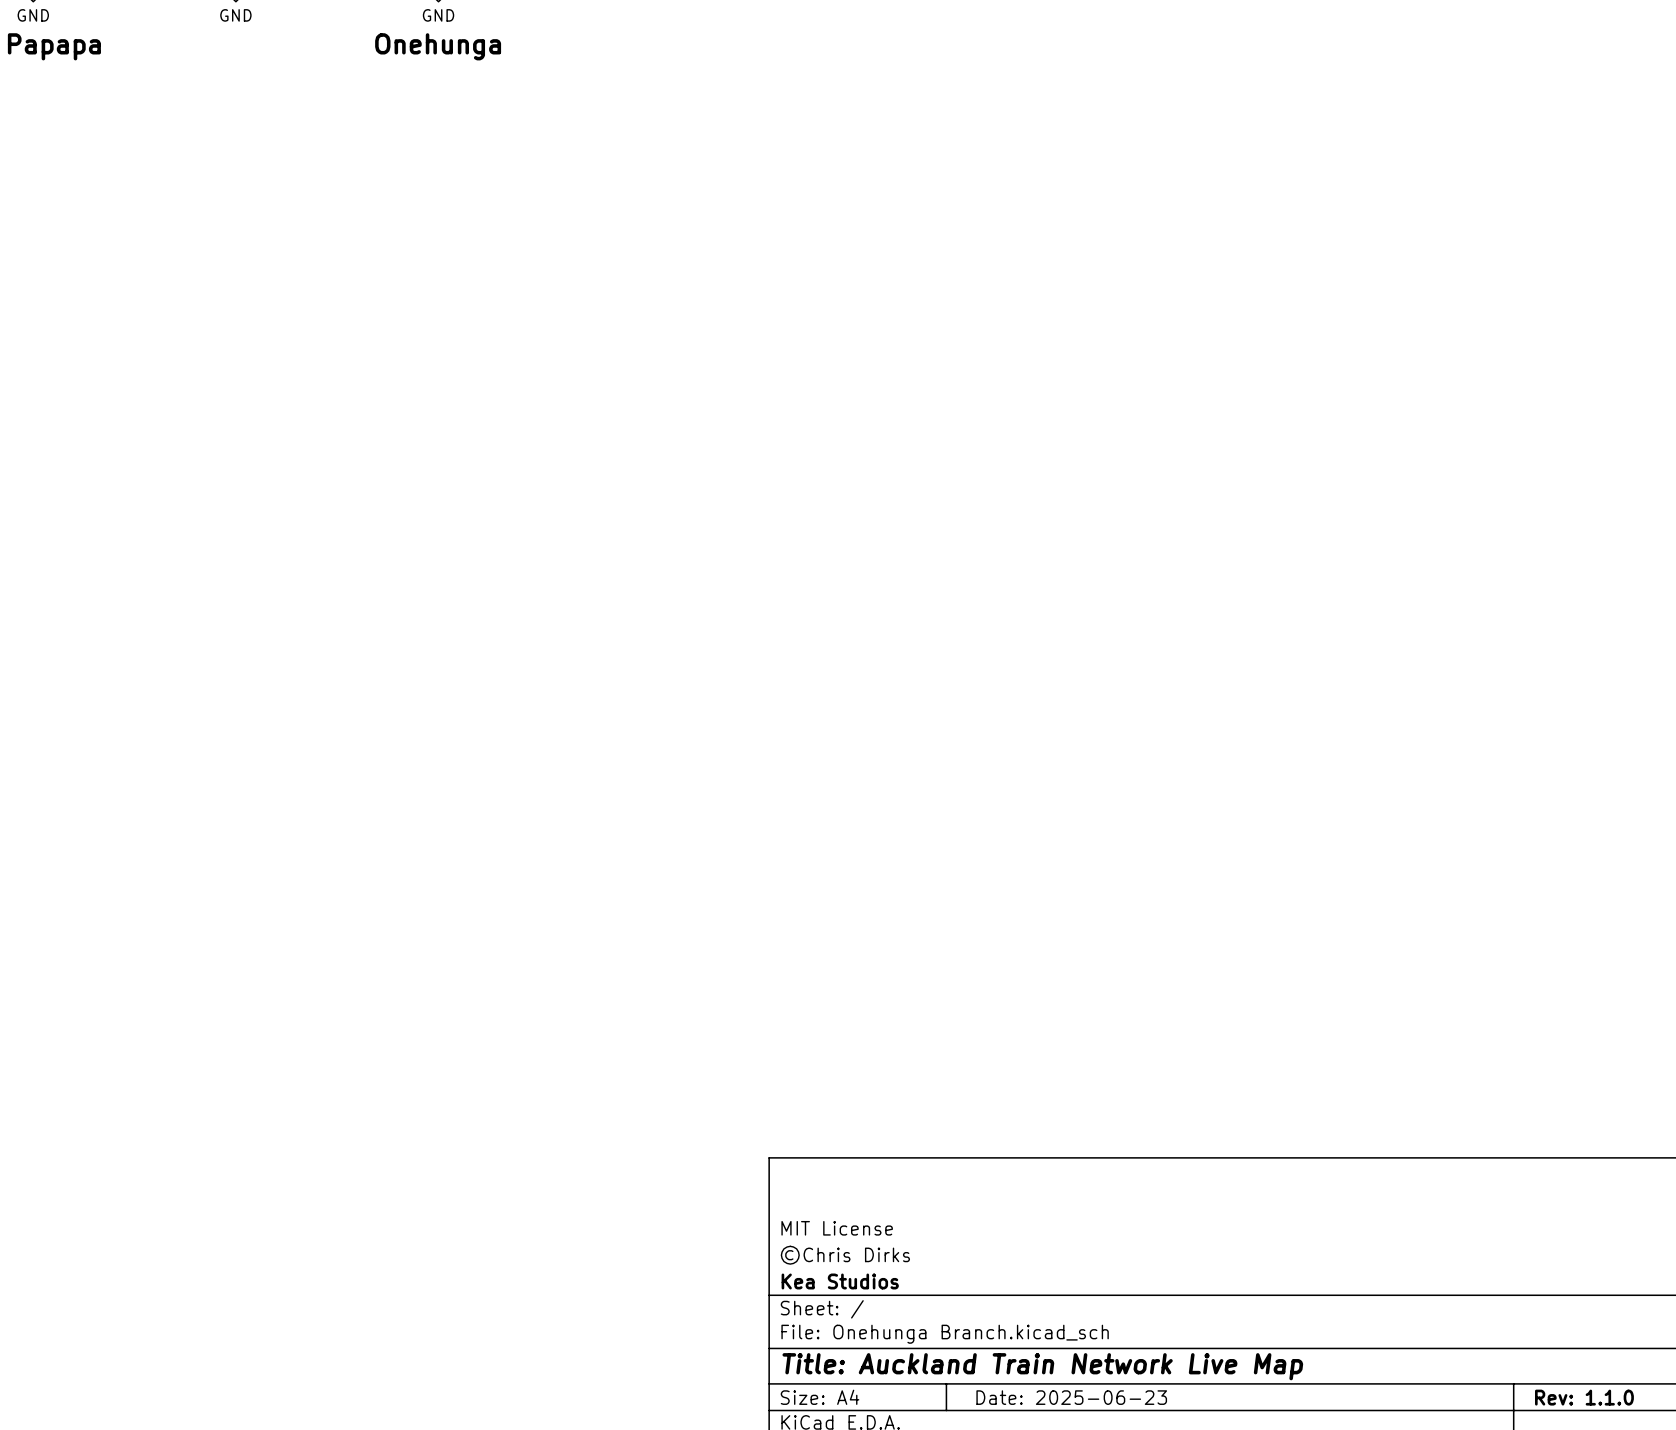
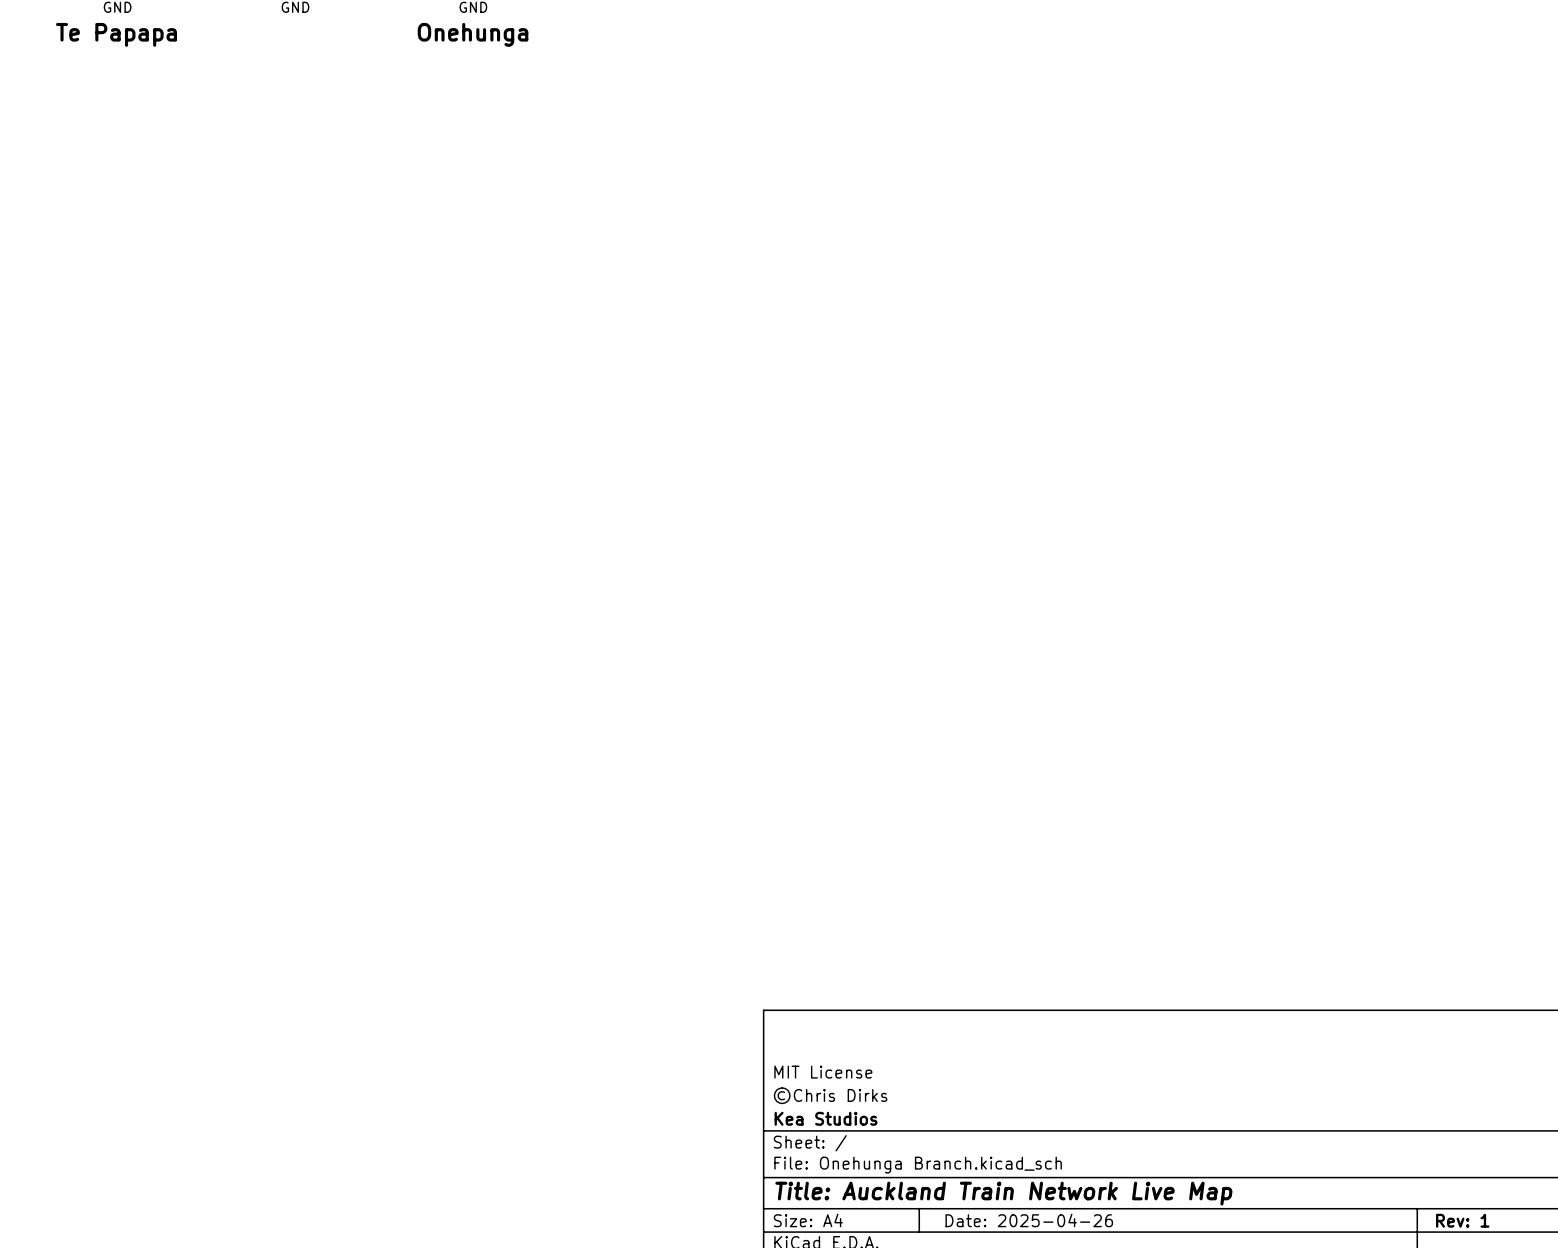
title block: Date: 2025-06-23 (1071, 1397) -> Date: 2025-04-26 (1029, 1220)
title block: Rev: 1.1.0 (1584, 1397) -> Rev: 1 (1462, 1220)

